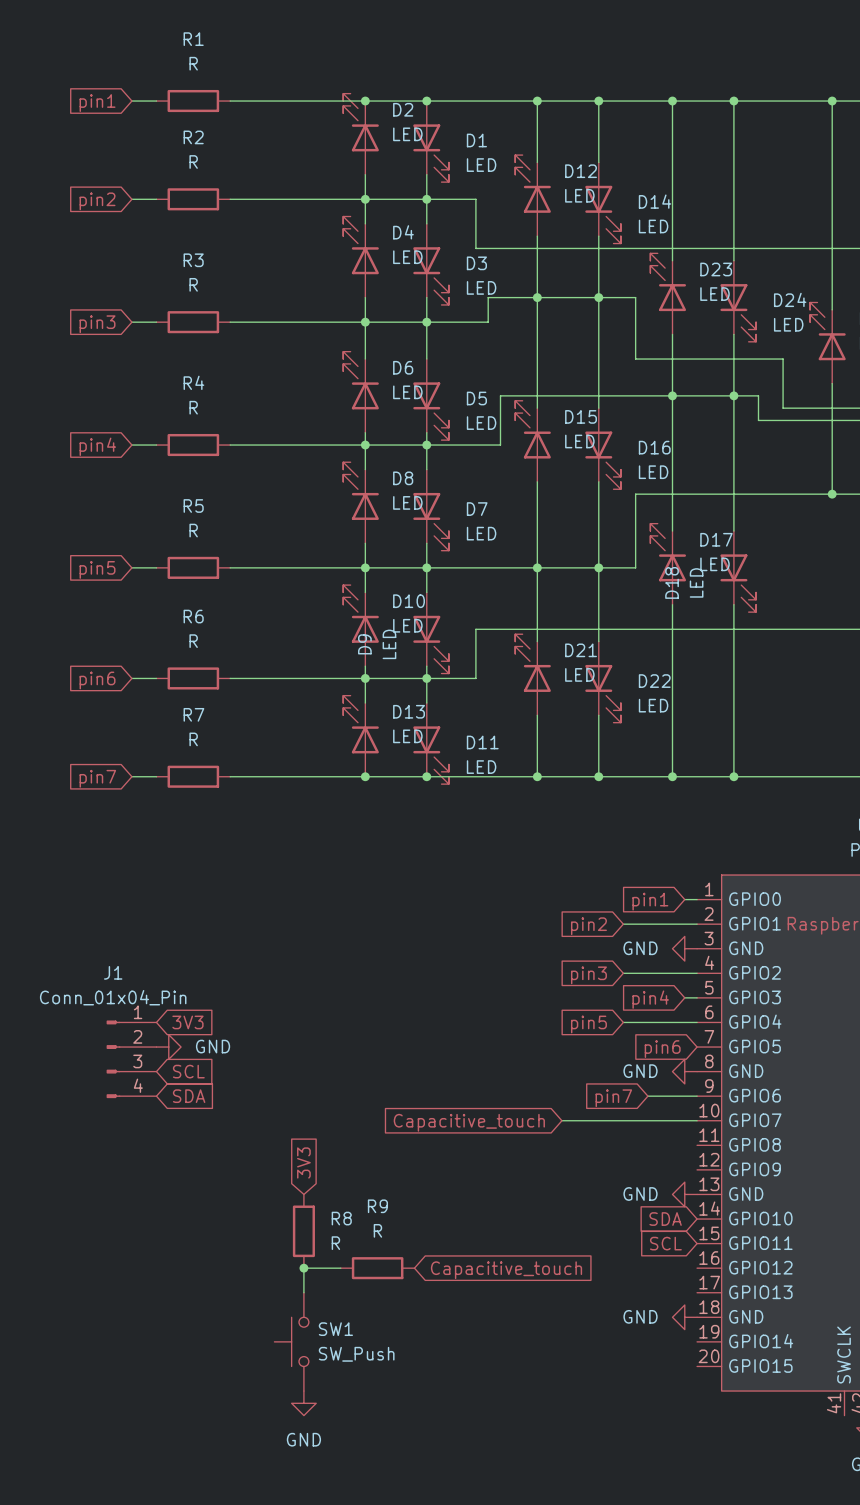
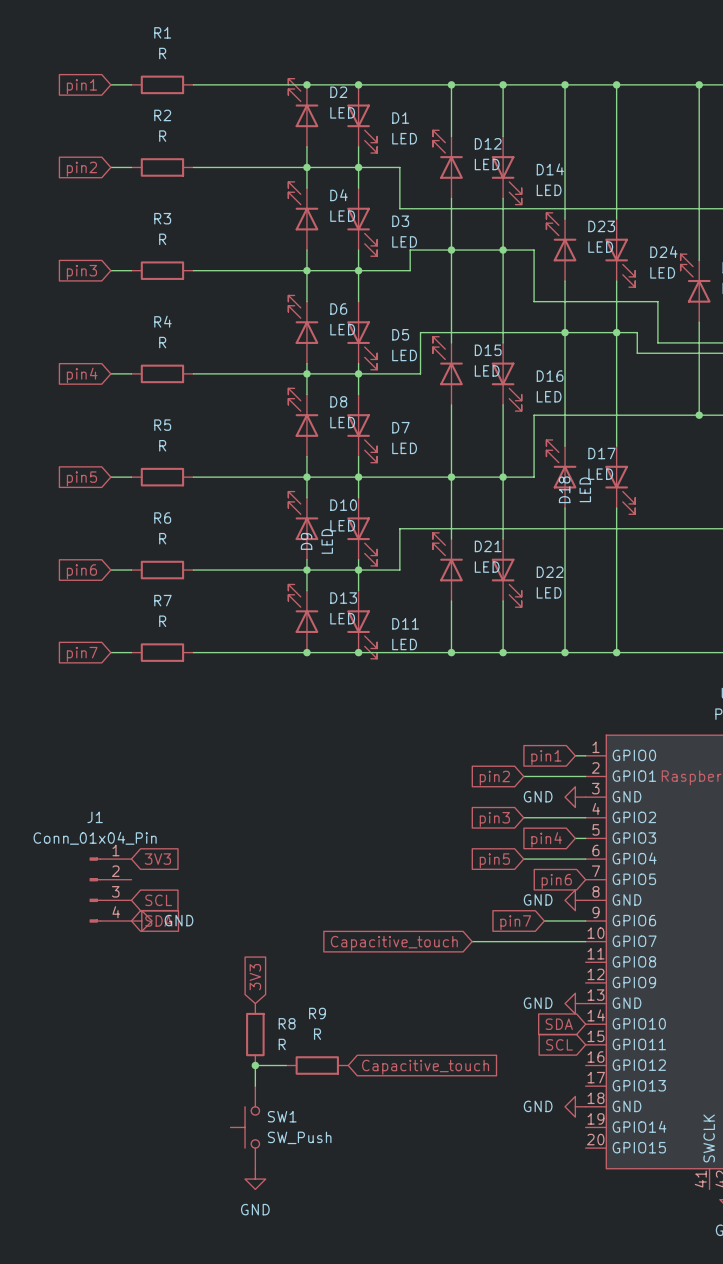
power symbol position: GND (168, 1047) -> GND (141, 920)

